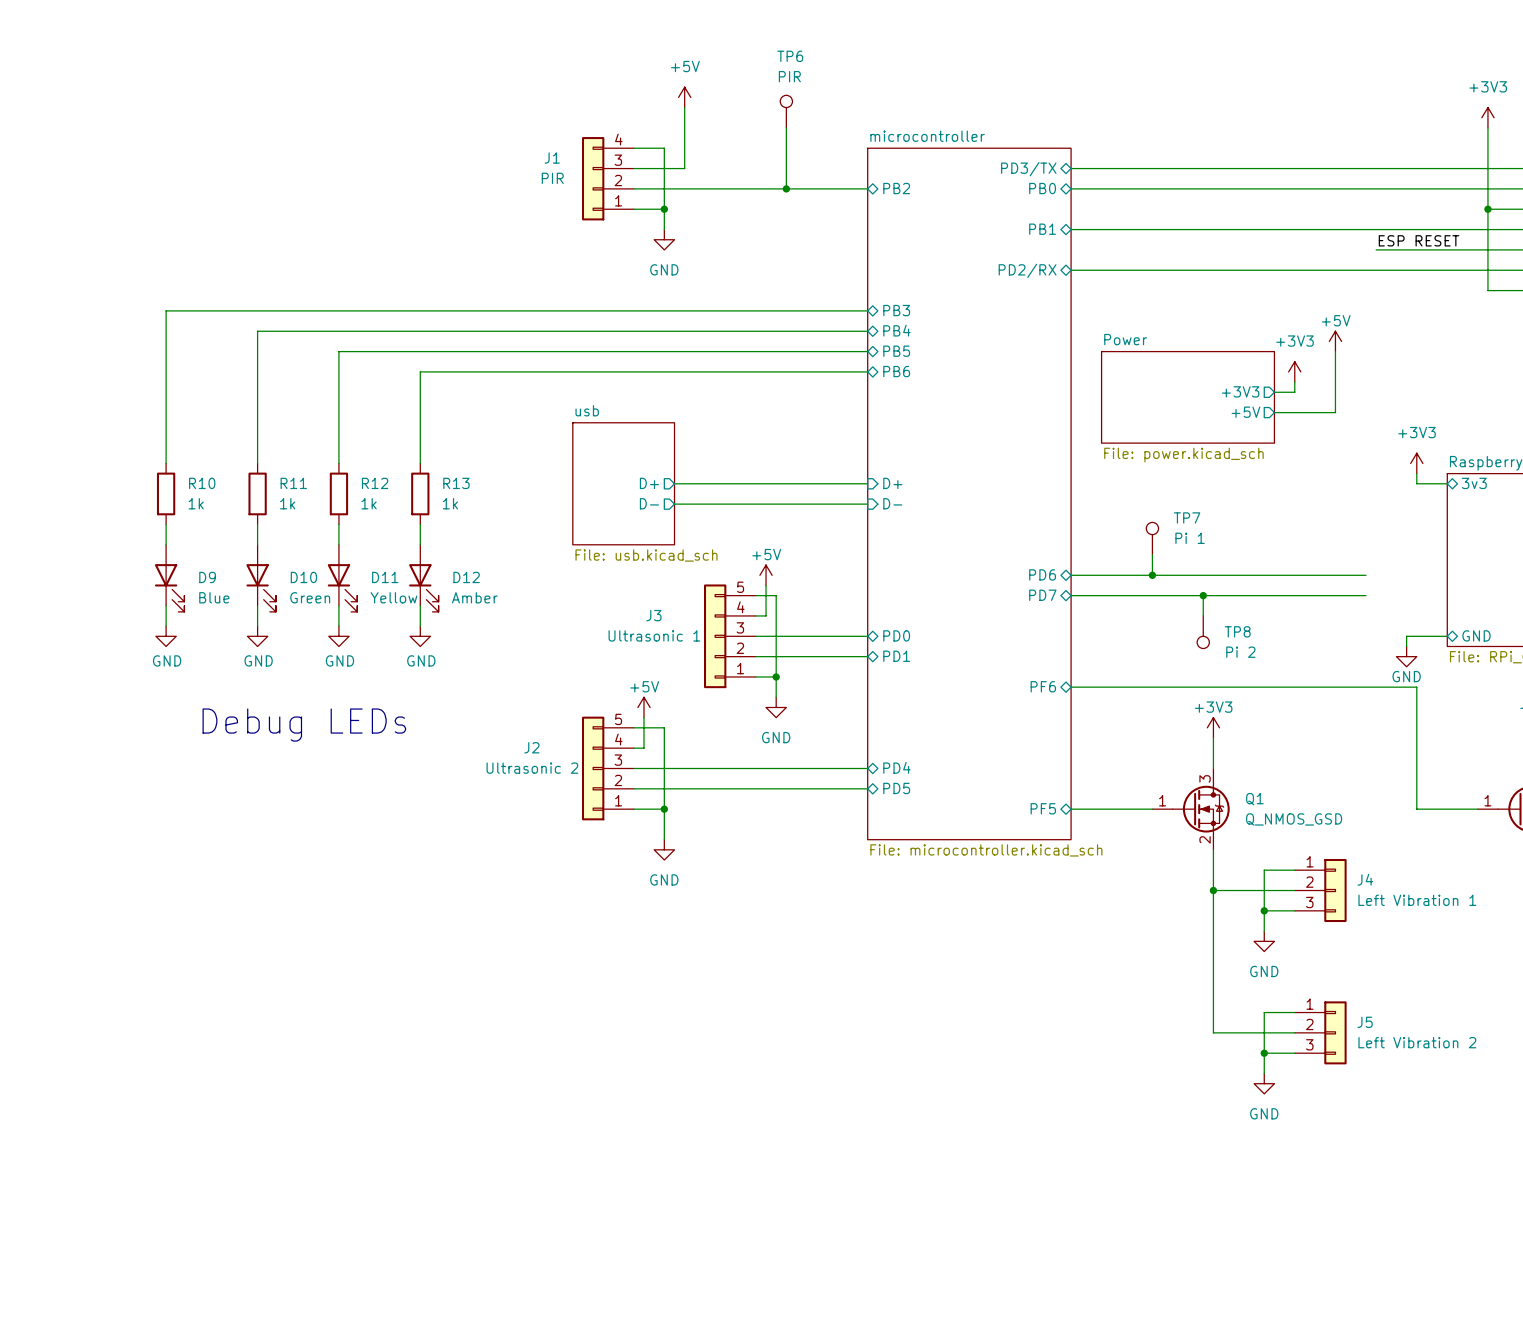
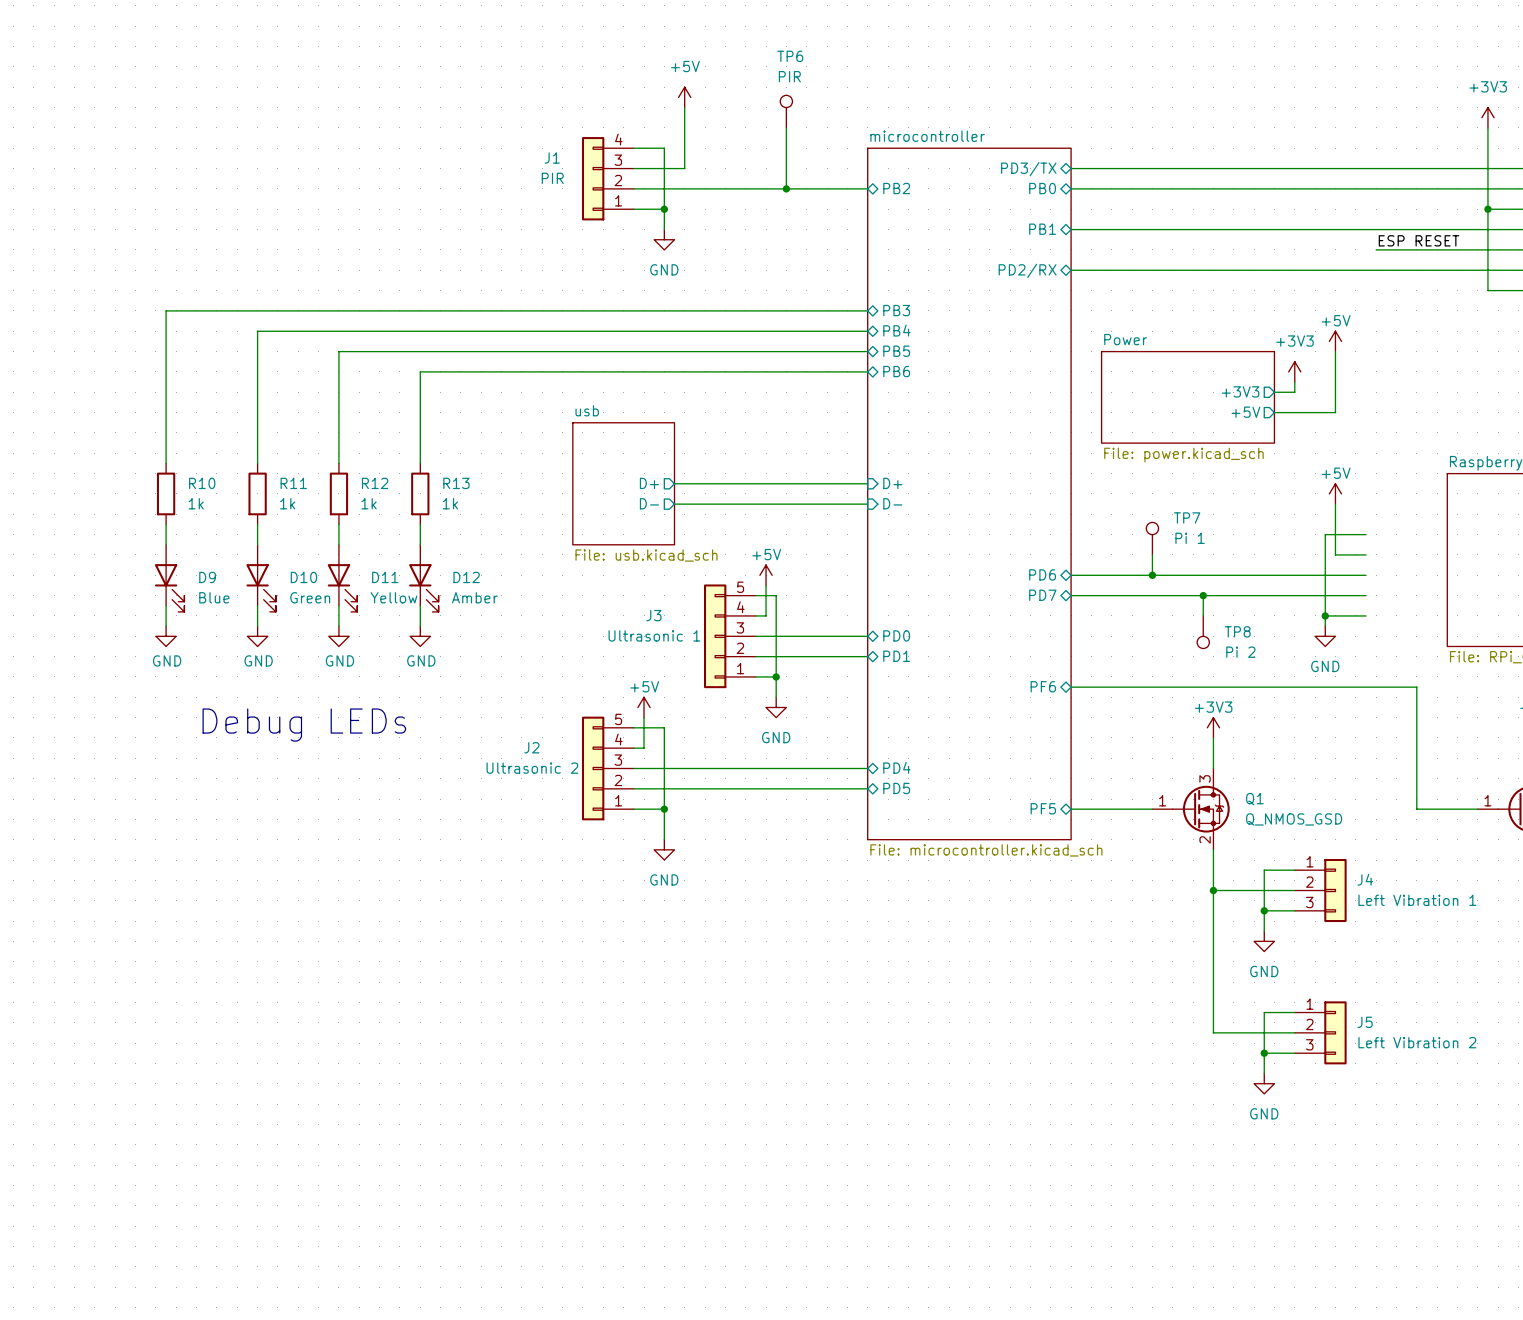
power symbol: +3V3 (1416, 463) -> none
wire: (1416, 473) (1416, 483) (1447, 483) -> none
sheet pin: 3v3 (1474, 483) -> none
power symbol: none -> +5V (1335, 493)
wire: none -> (1335, 504) (1335, 554) (1365, 554)
wire: none -> (1365, 534) (1325, 534) (1325, 626)
wire: none -> (1325, 615) (1365, 615)
junction: none -> (1325, 615)
sheet pin: GND (1476, 635) -> none
wire: (1447, 636) (1406, 636) (1406, 646) -> none
power symbol position: GND (1406, 656) -> GND (1325, 636)
power symbol text position: GND (1406, 676) -> GND (1325, 666)

